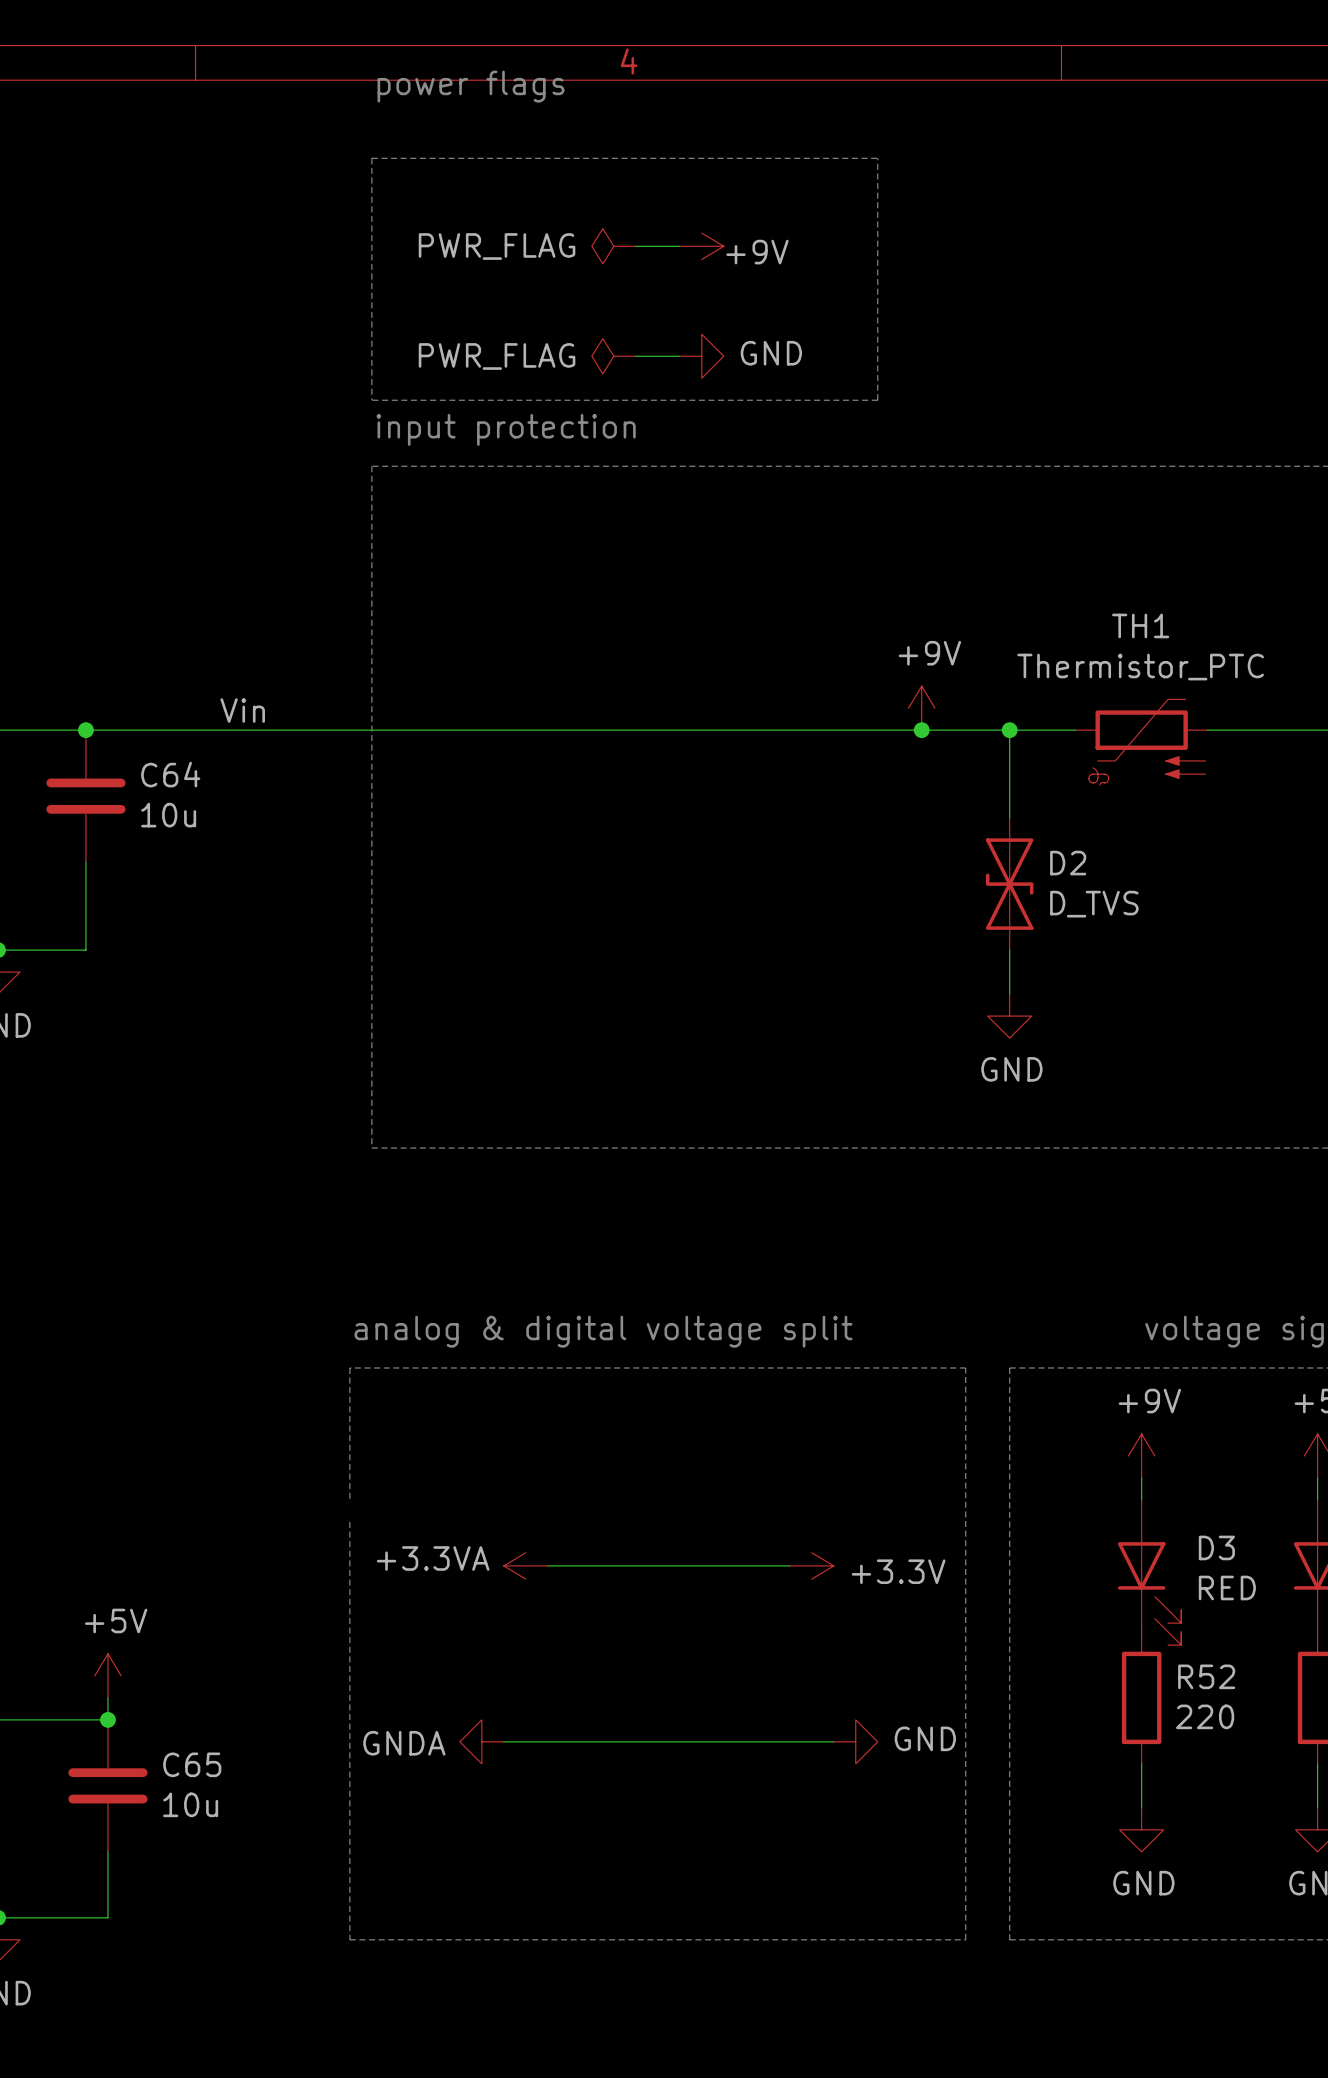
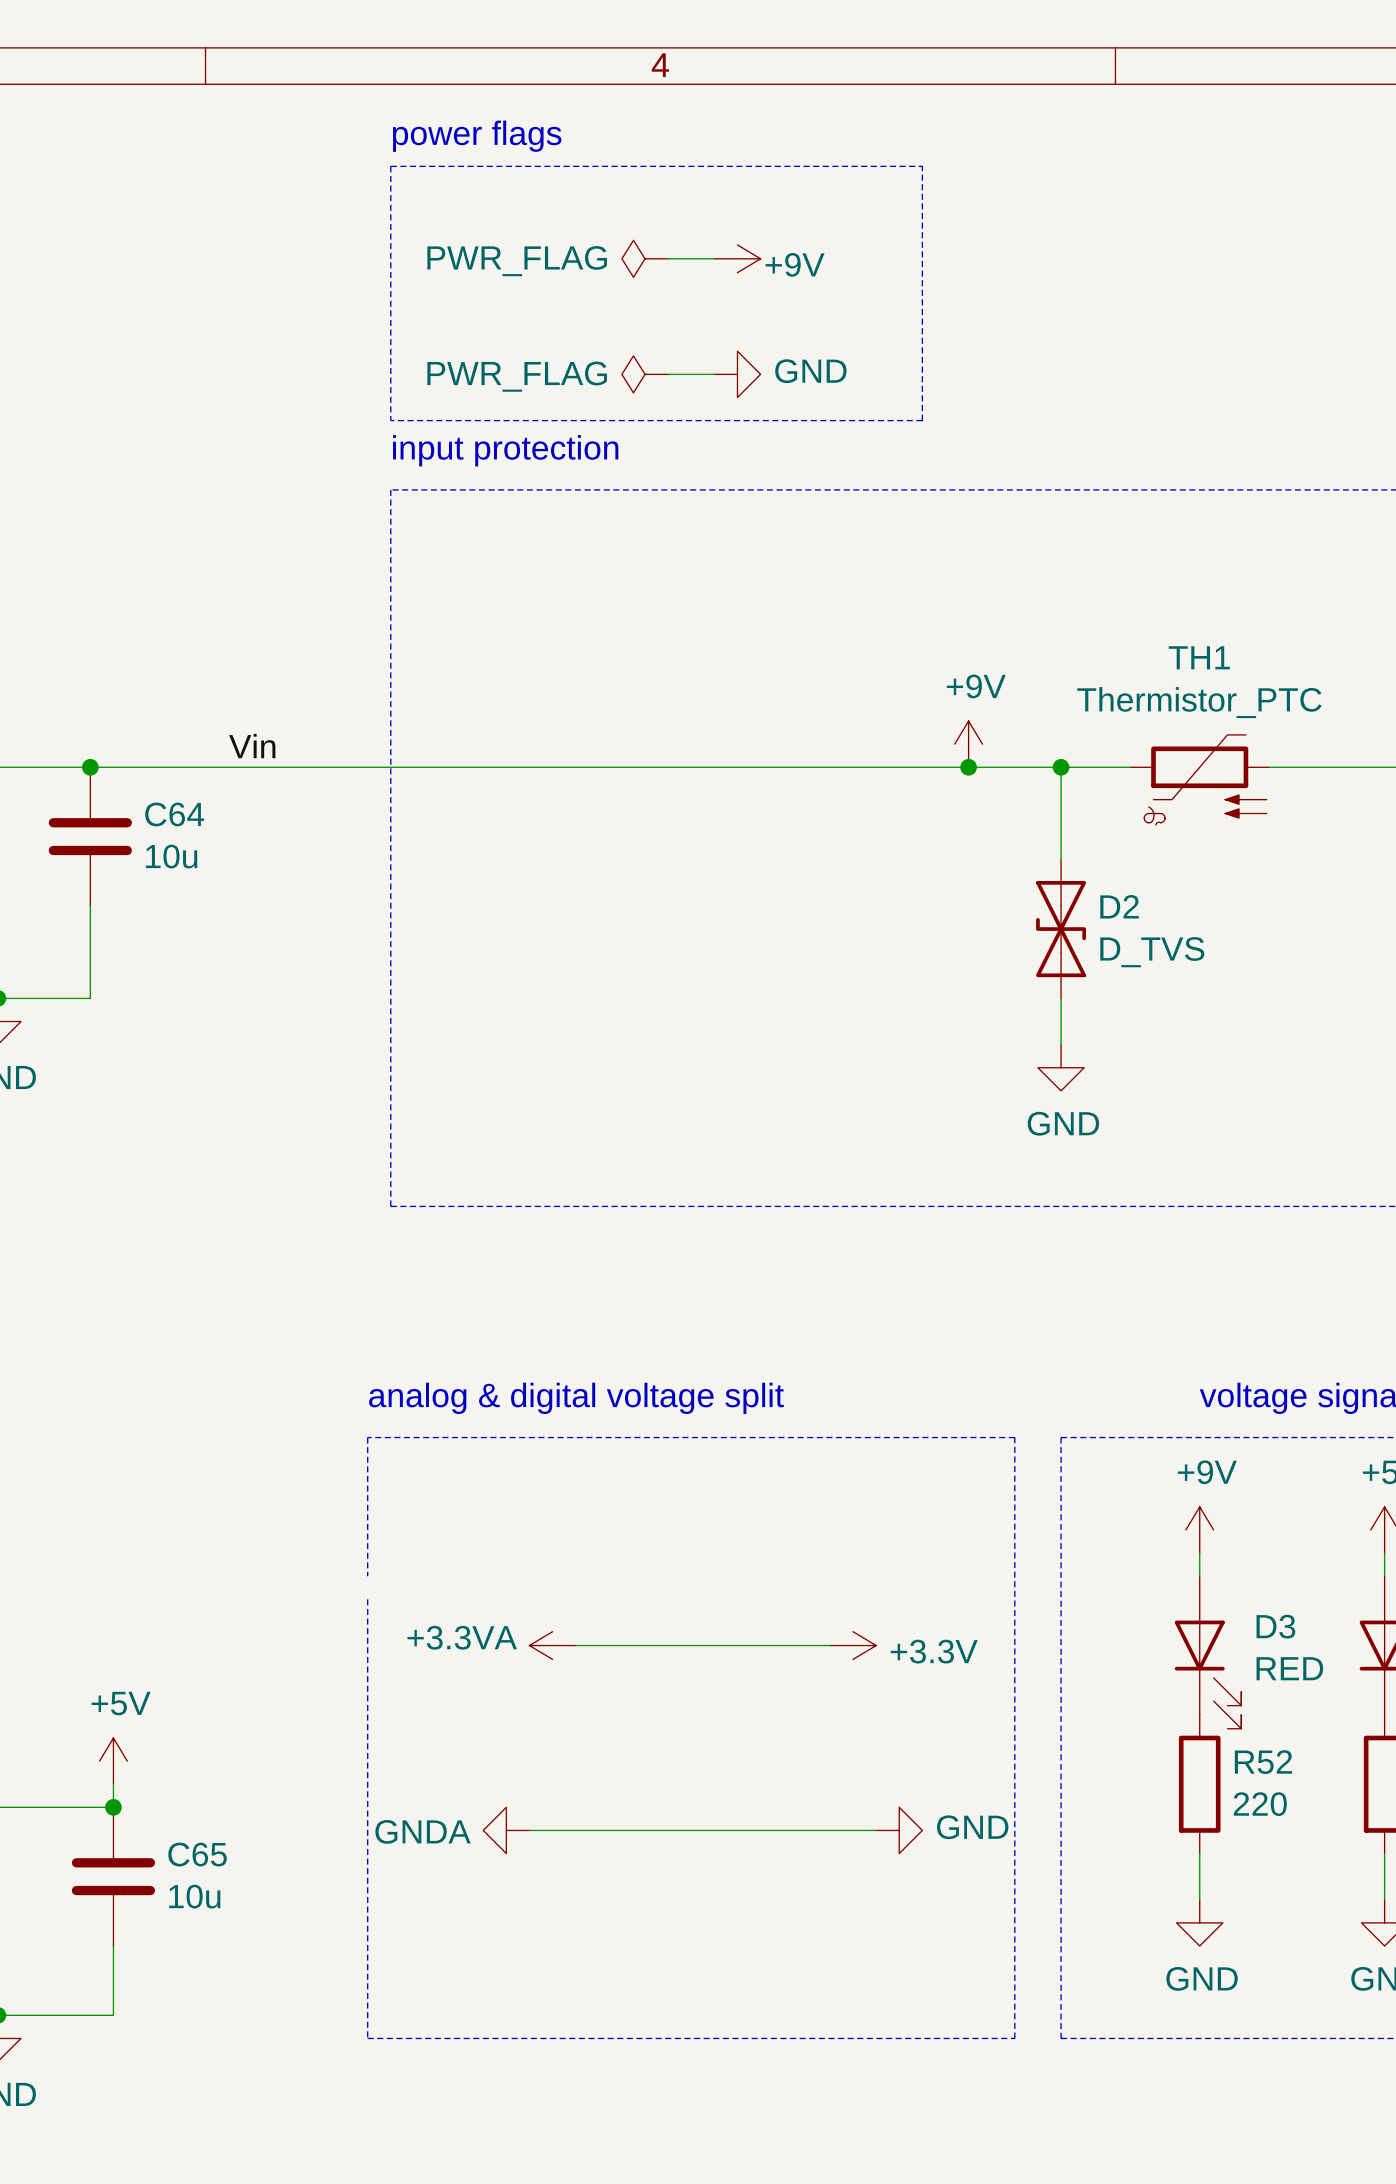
text position: power flags (471, 86) -> power flags (477, 136)

